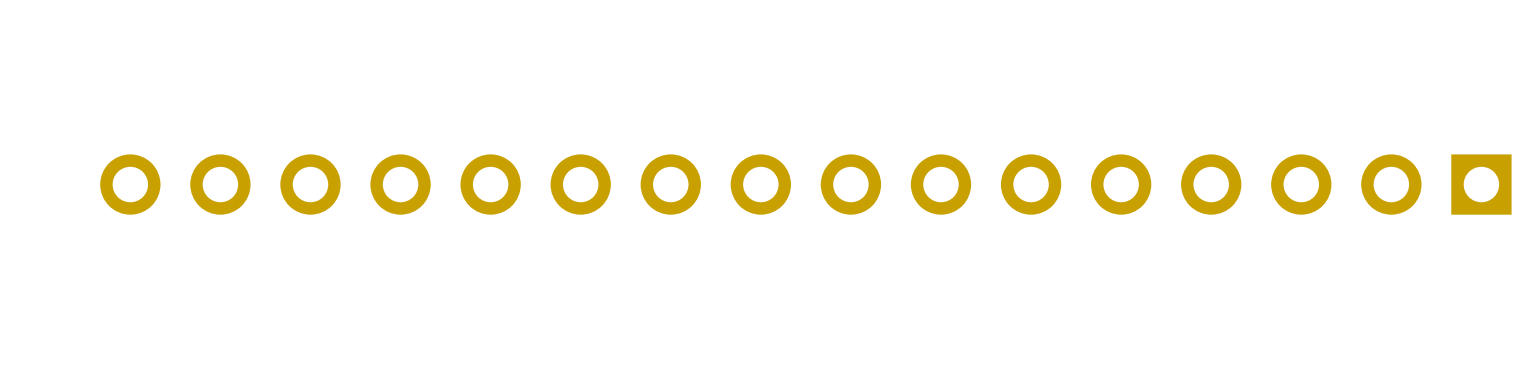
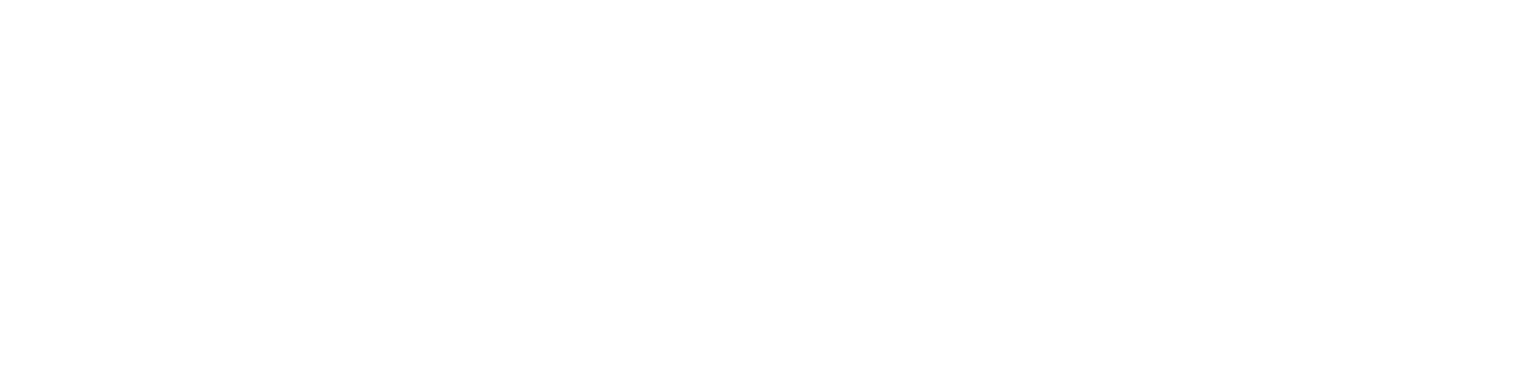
part: (805, 184) -> none

